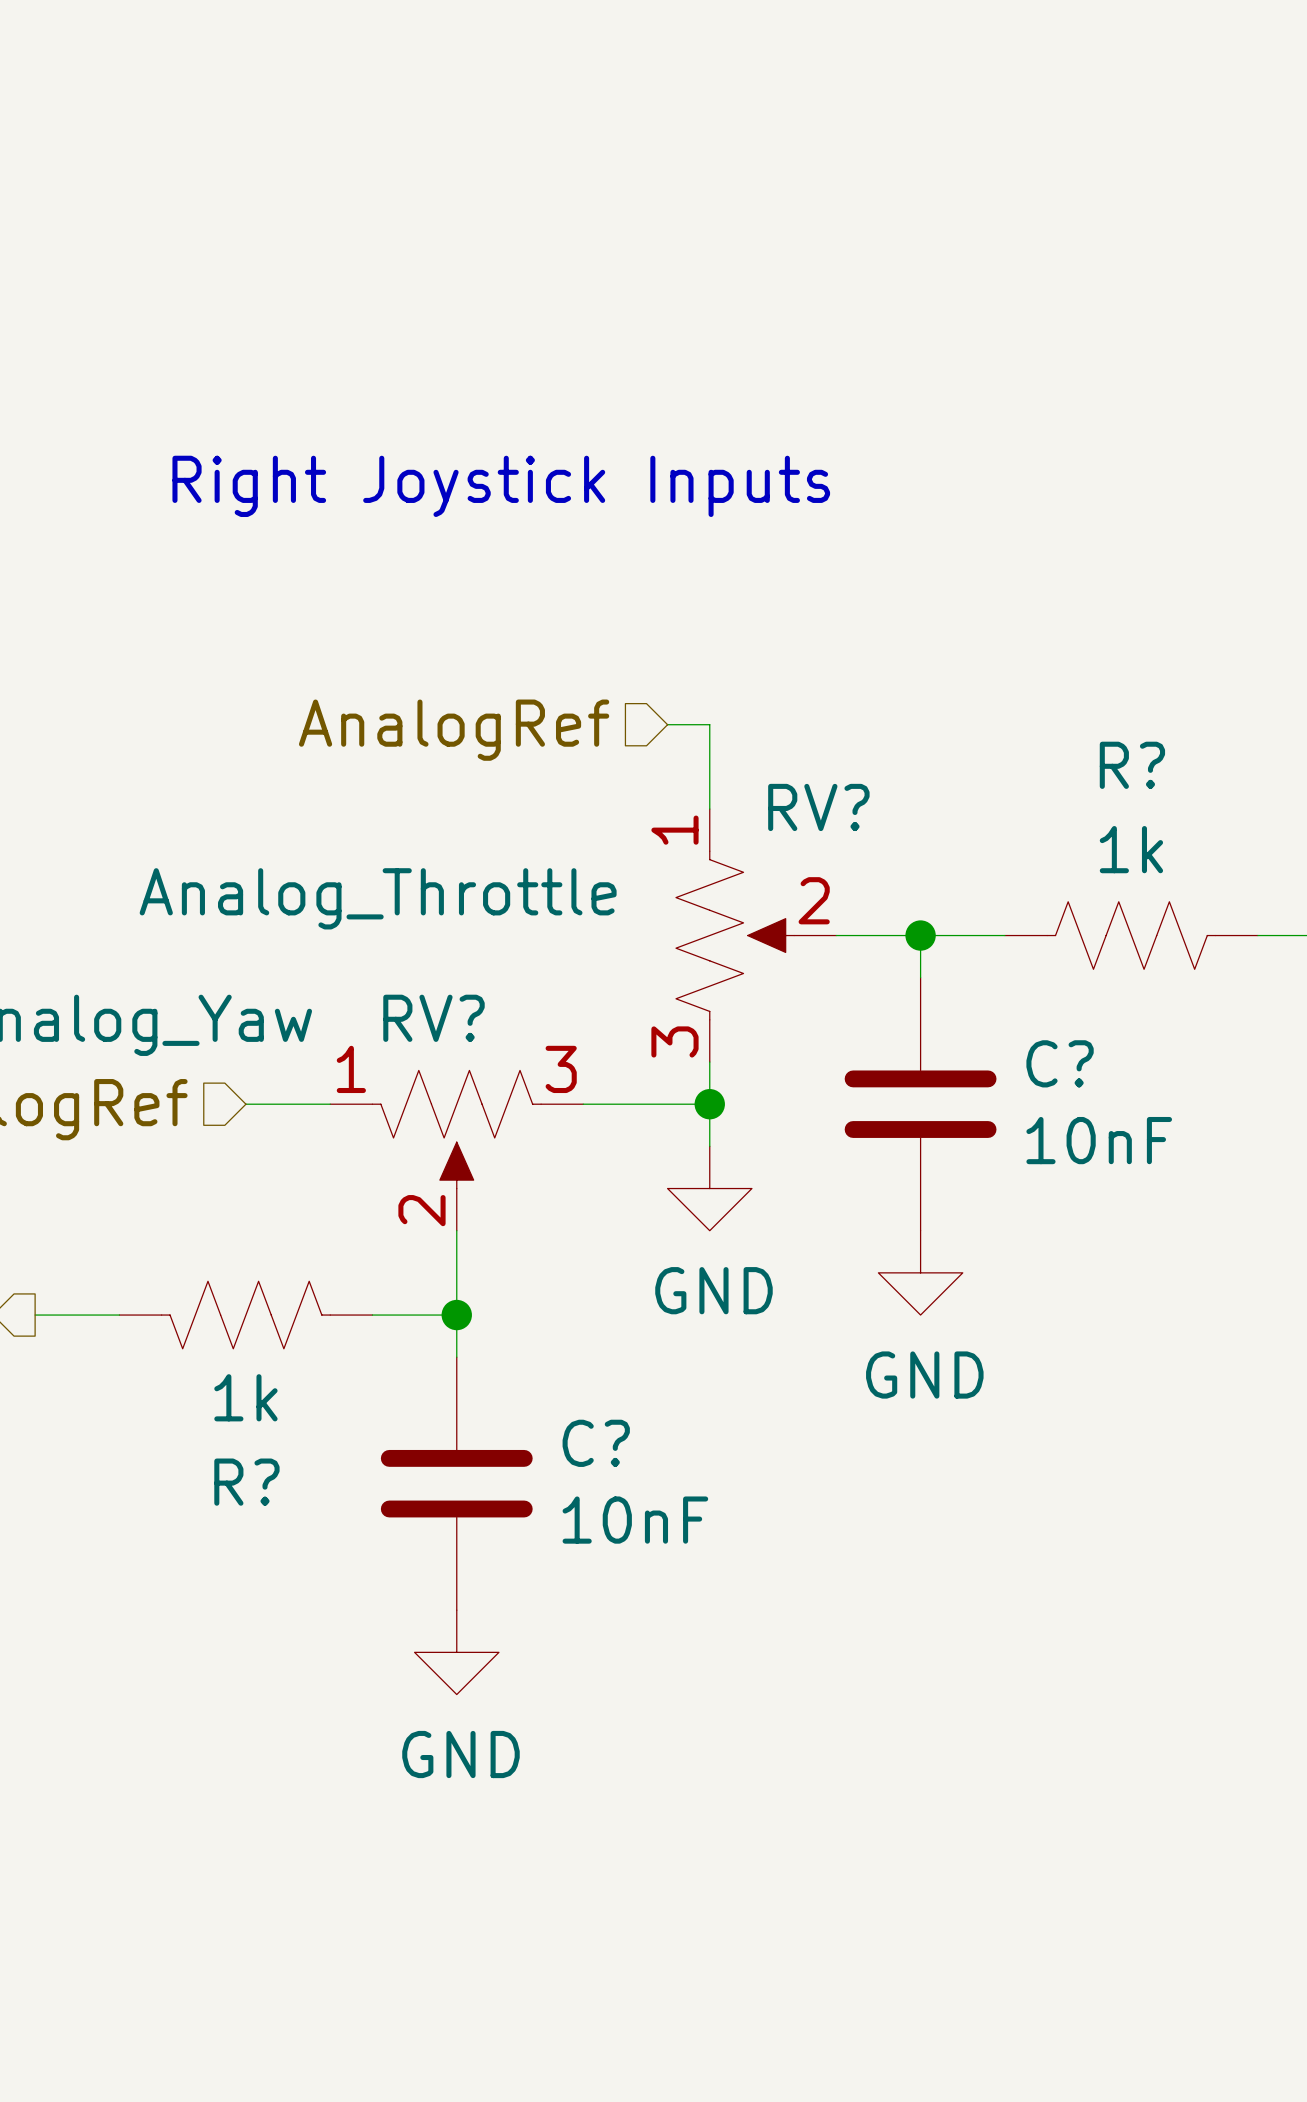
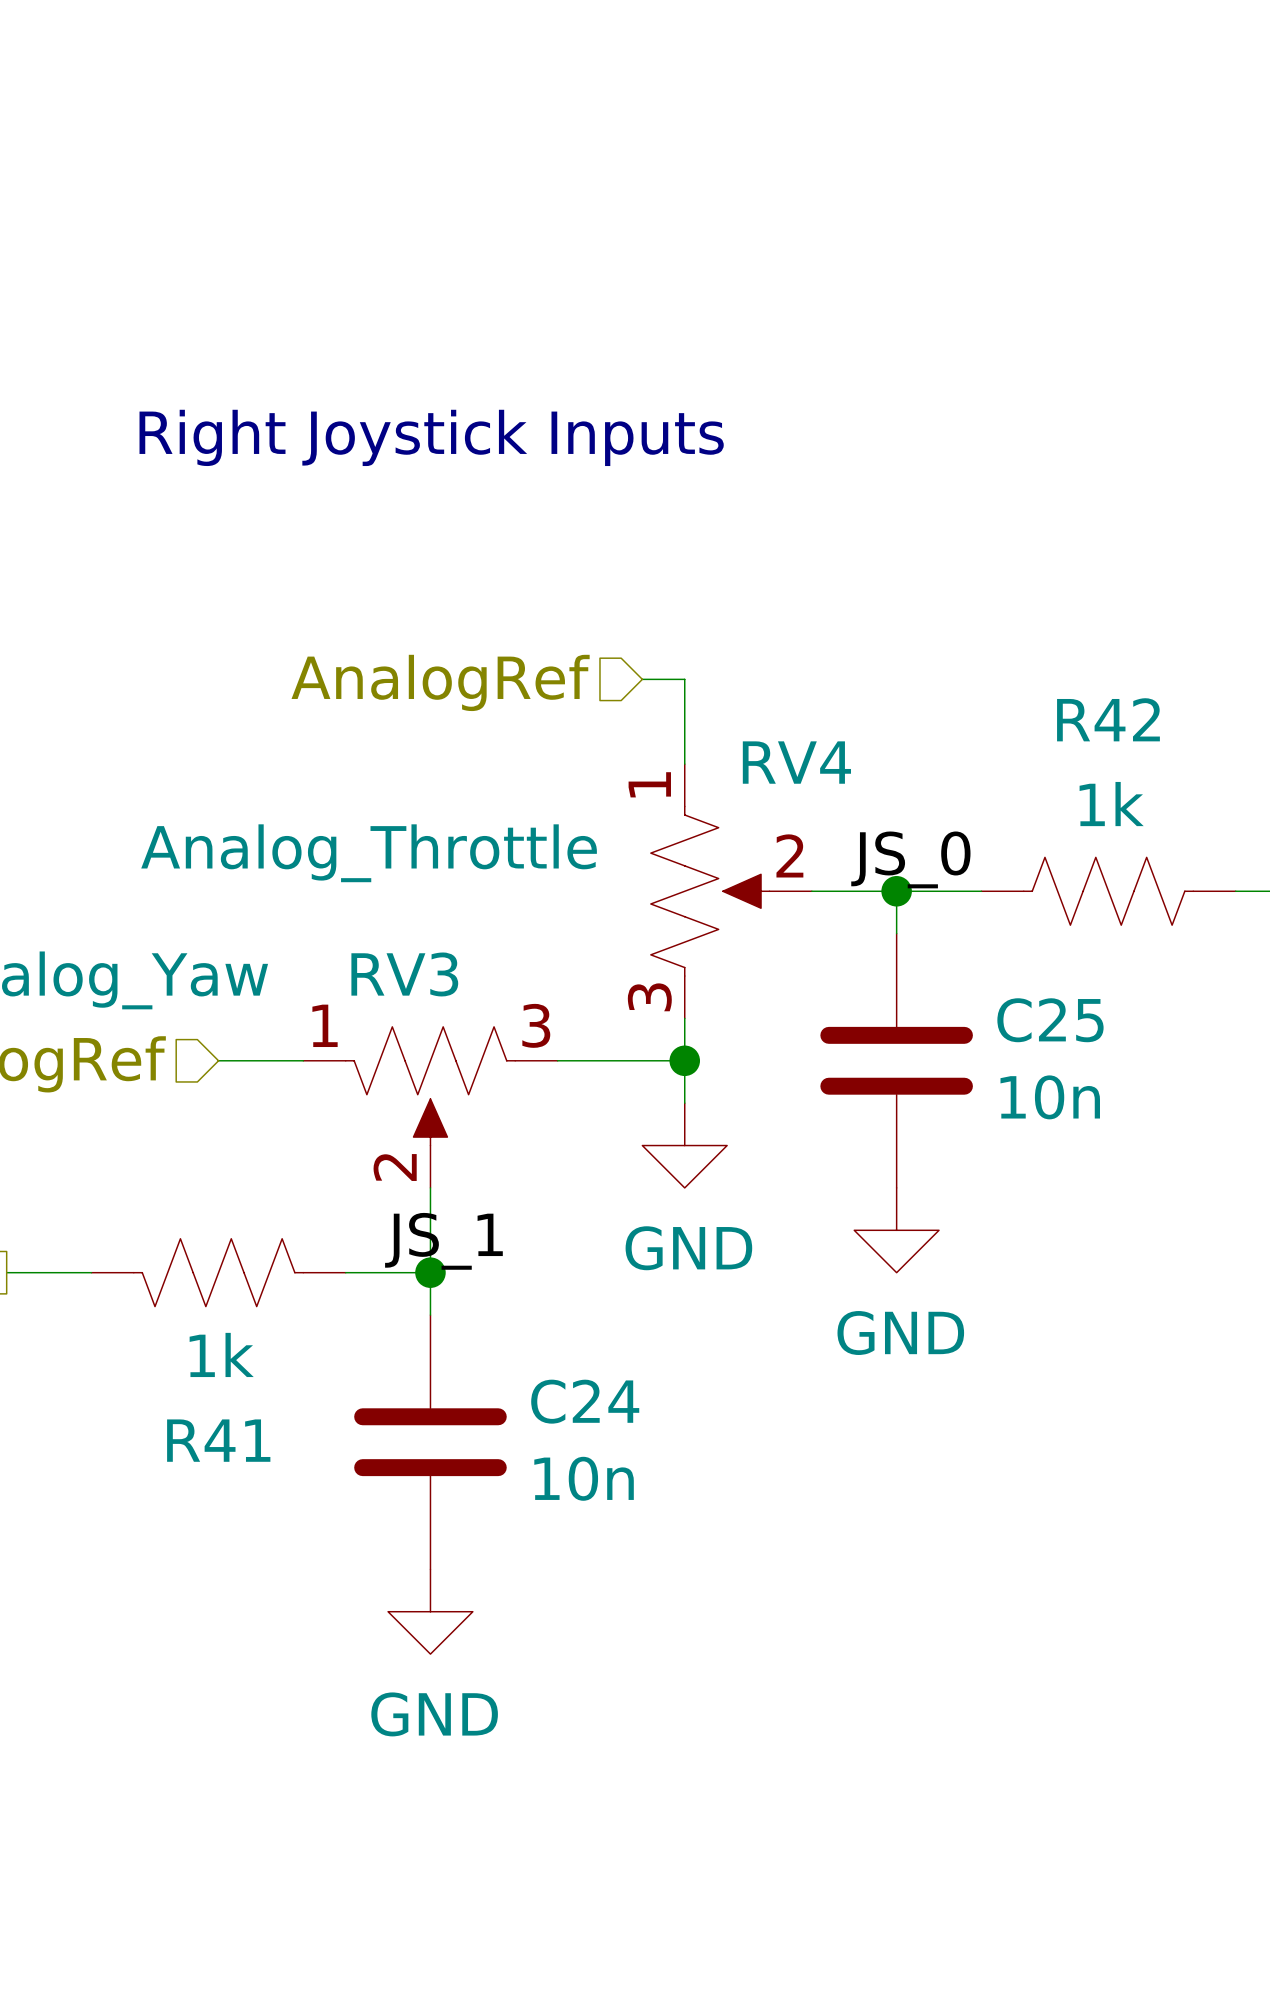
R? name: R? (1132, 765) -> R42 (1108, 719)
RV? name: RV? (818, 807) -> RV4 (796, 762)
label: none -> JS_0 (910, 859)
RV? name: RV? (433, 1018) -> RV3 (404, 974)
C? name: C? (1060, 1063) -> C25 (1050, 1020)
C? value: 10nF (1099, 1140) -> 10n (1050, 1097)
label: none -> JS_1 (443, 1241)
C? name: C? (596, 1443) -> C24 (585, 1401)
R? name: R? (246, 1482) -> R41 (218, 1440)
C? value: 10nF (635, 1520) -> 10n (584, 1478)

